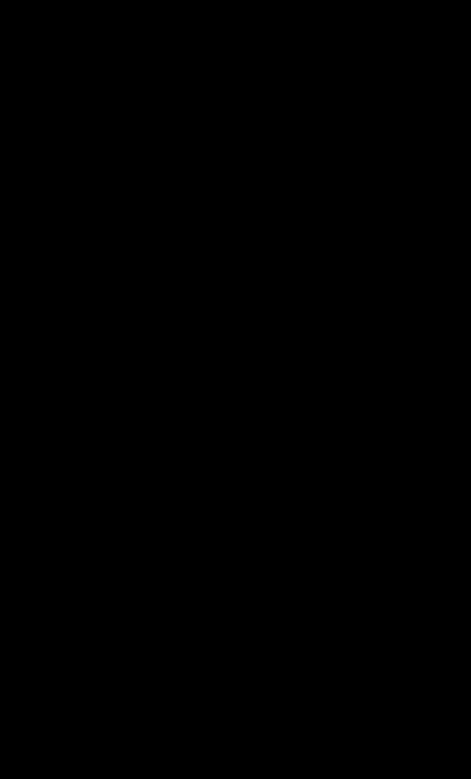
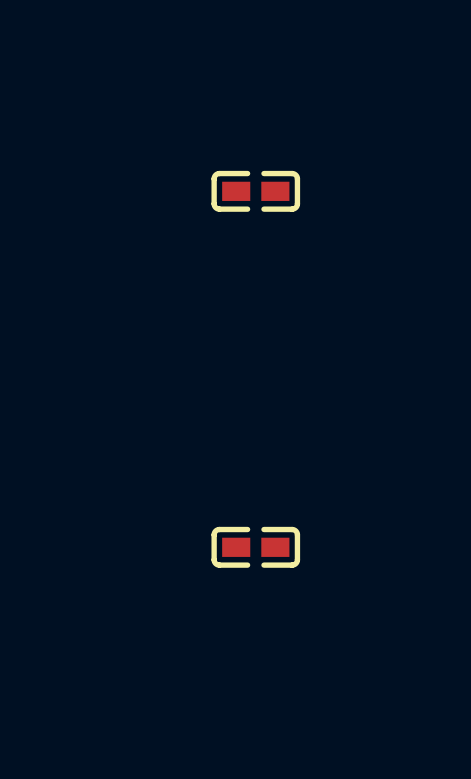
part: none -> (255, 191)
part: none -> (255, 547)

